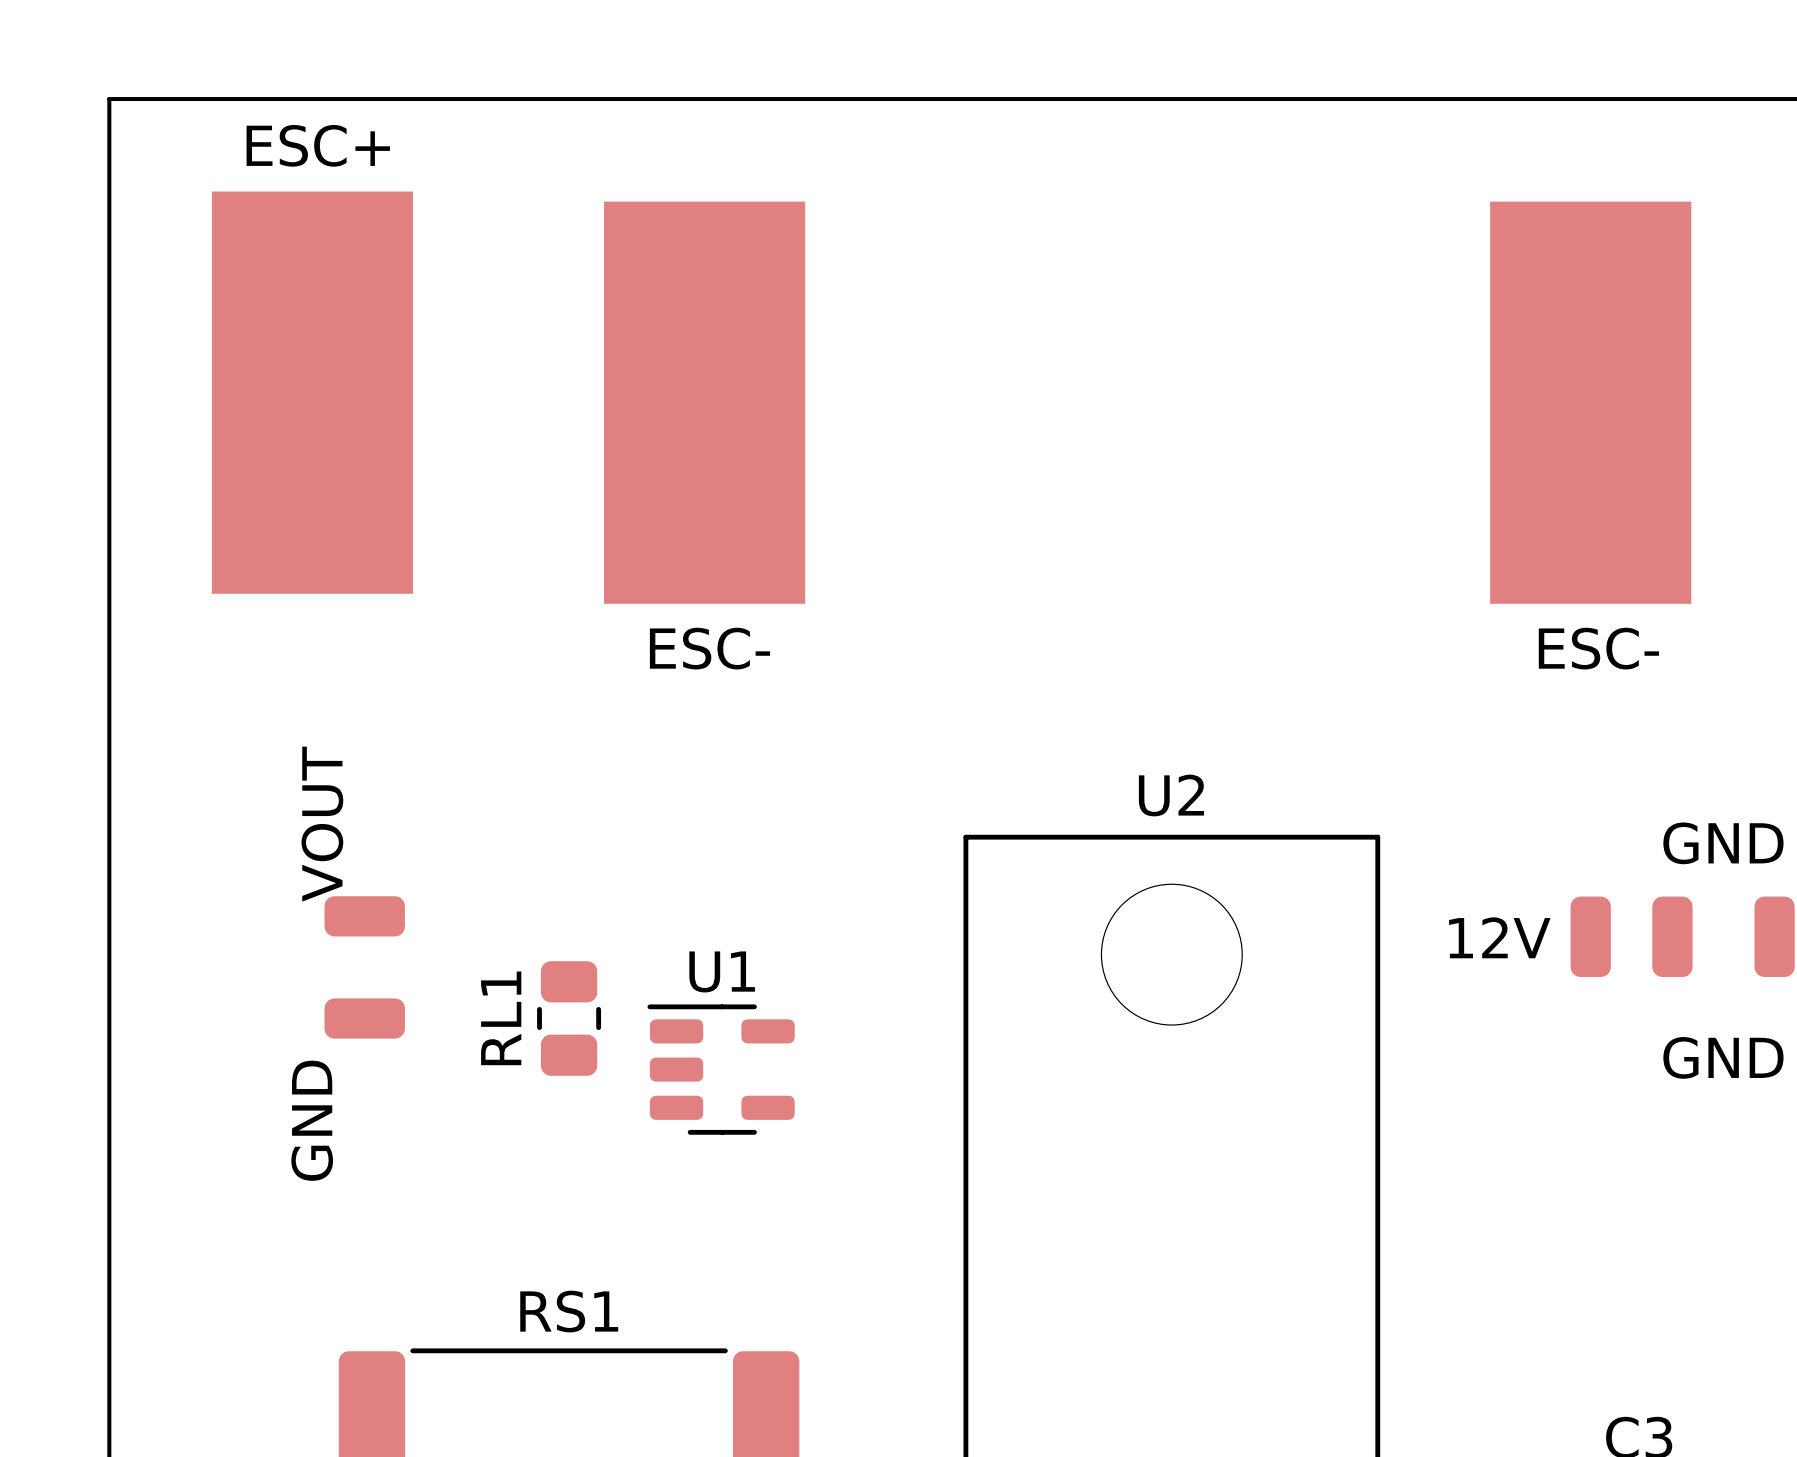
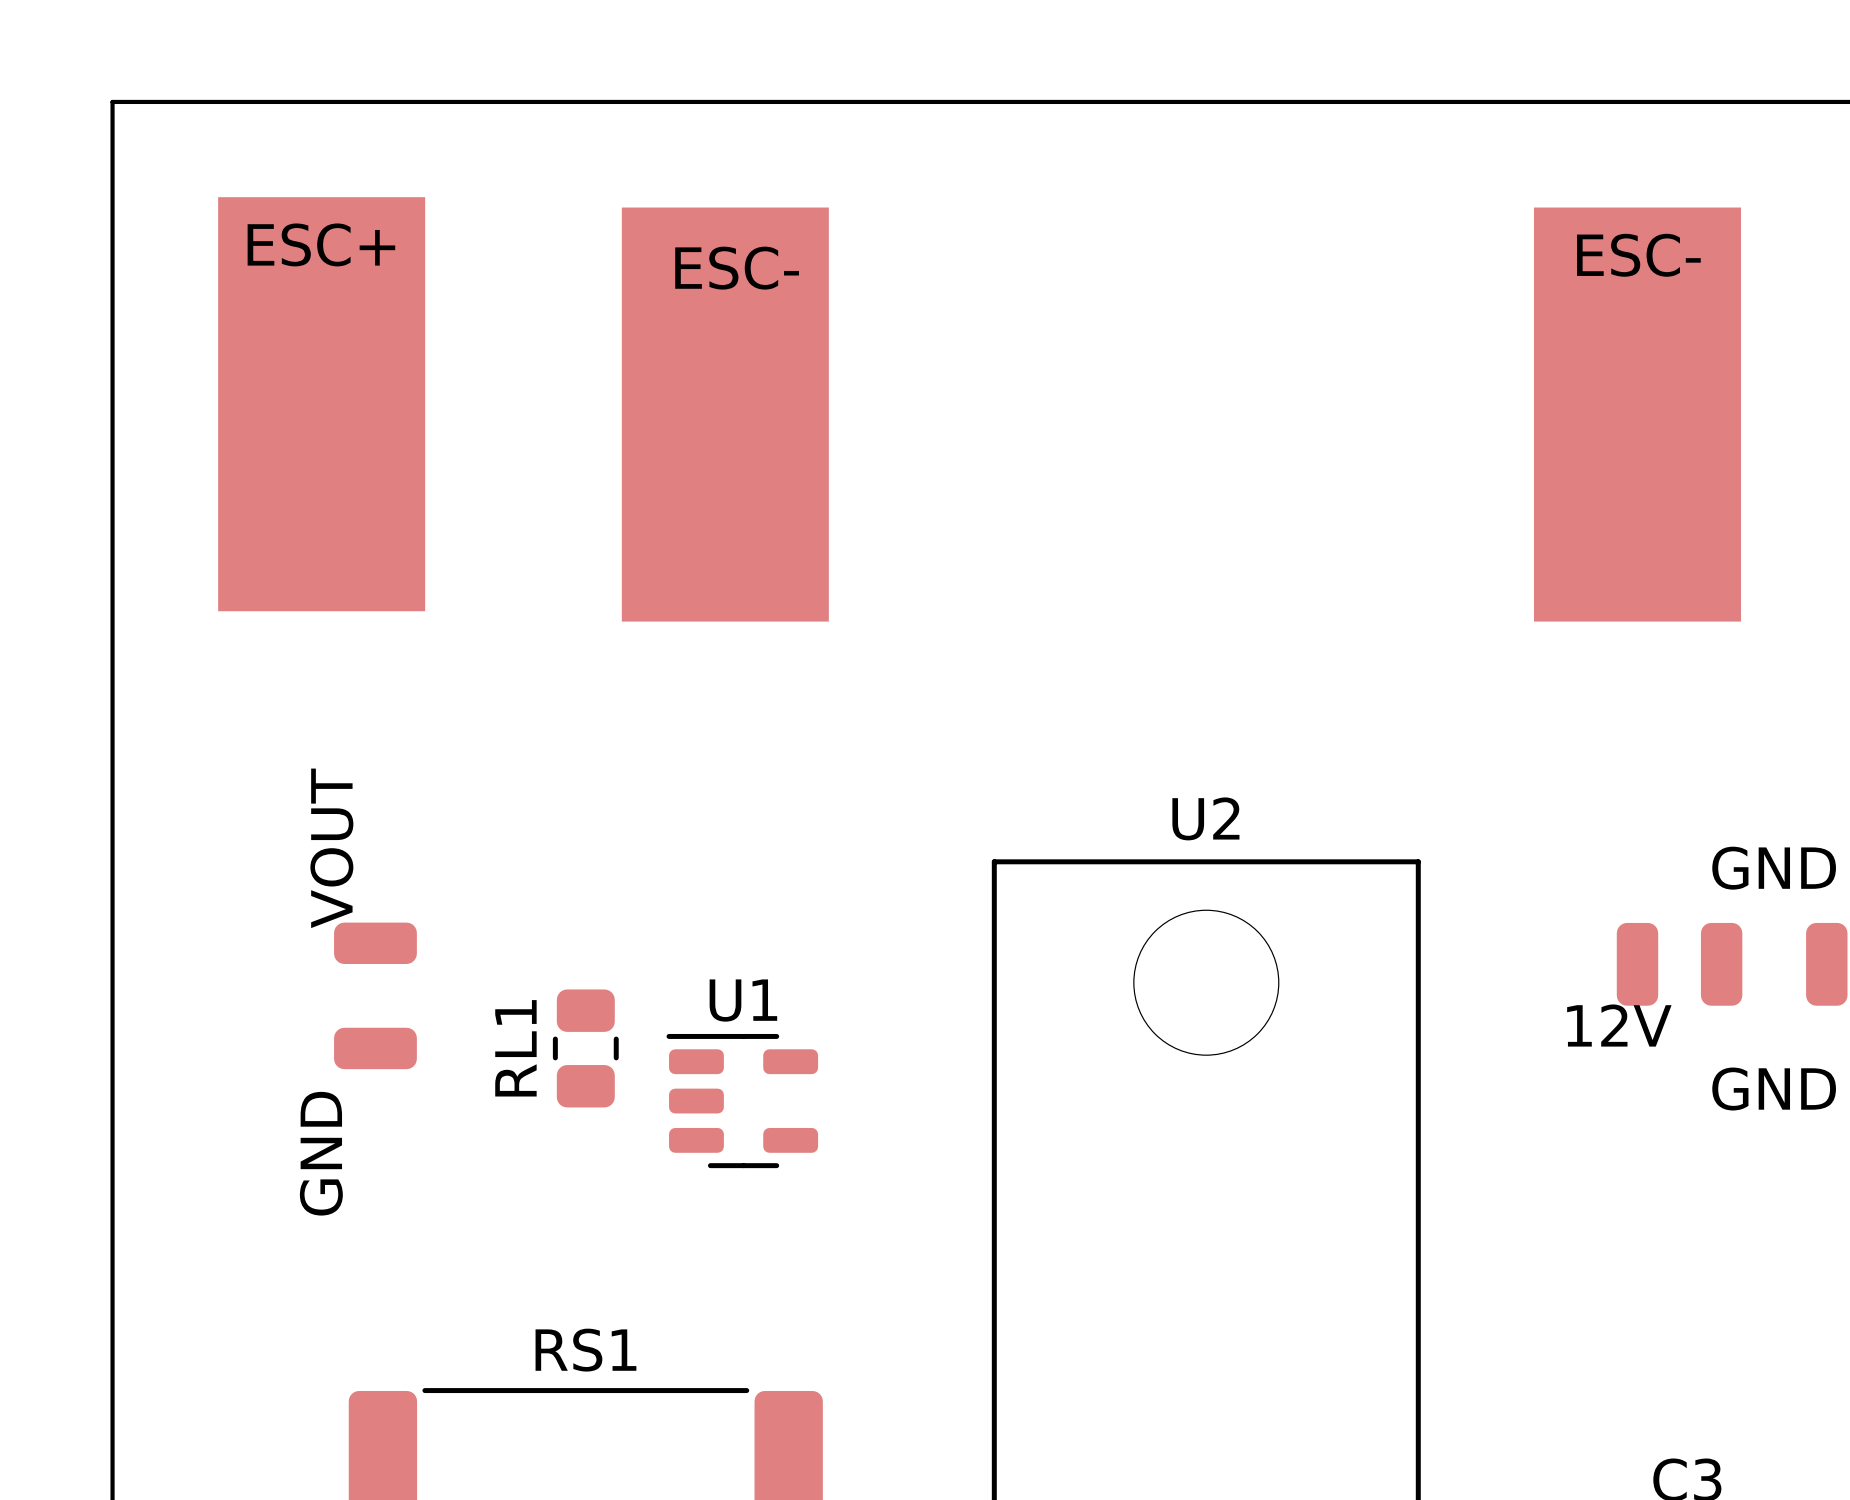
ESC+ name position: ESC+ (318, 145) -> ESC+ (321, 244)
ESC- name position: ESC- (710, 648) -> ESC- (737, 268)
ESC- name position: ESC- (1598, 648) -> ESC- (1638, 255)
12V name position: 12V (1499, 937) -> 12V (1619, 1025)

